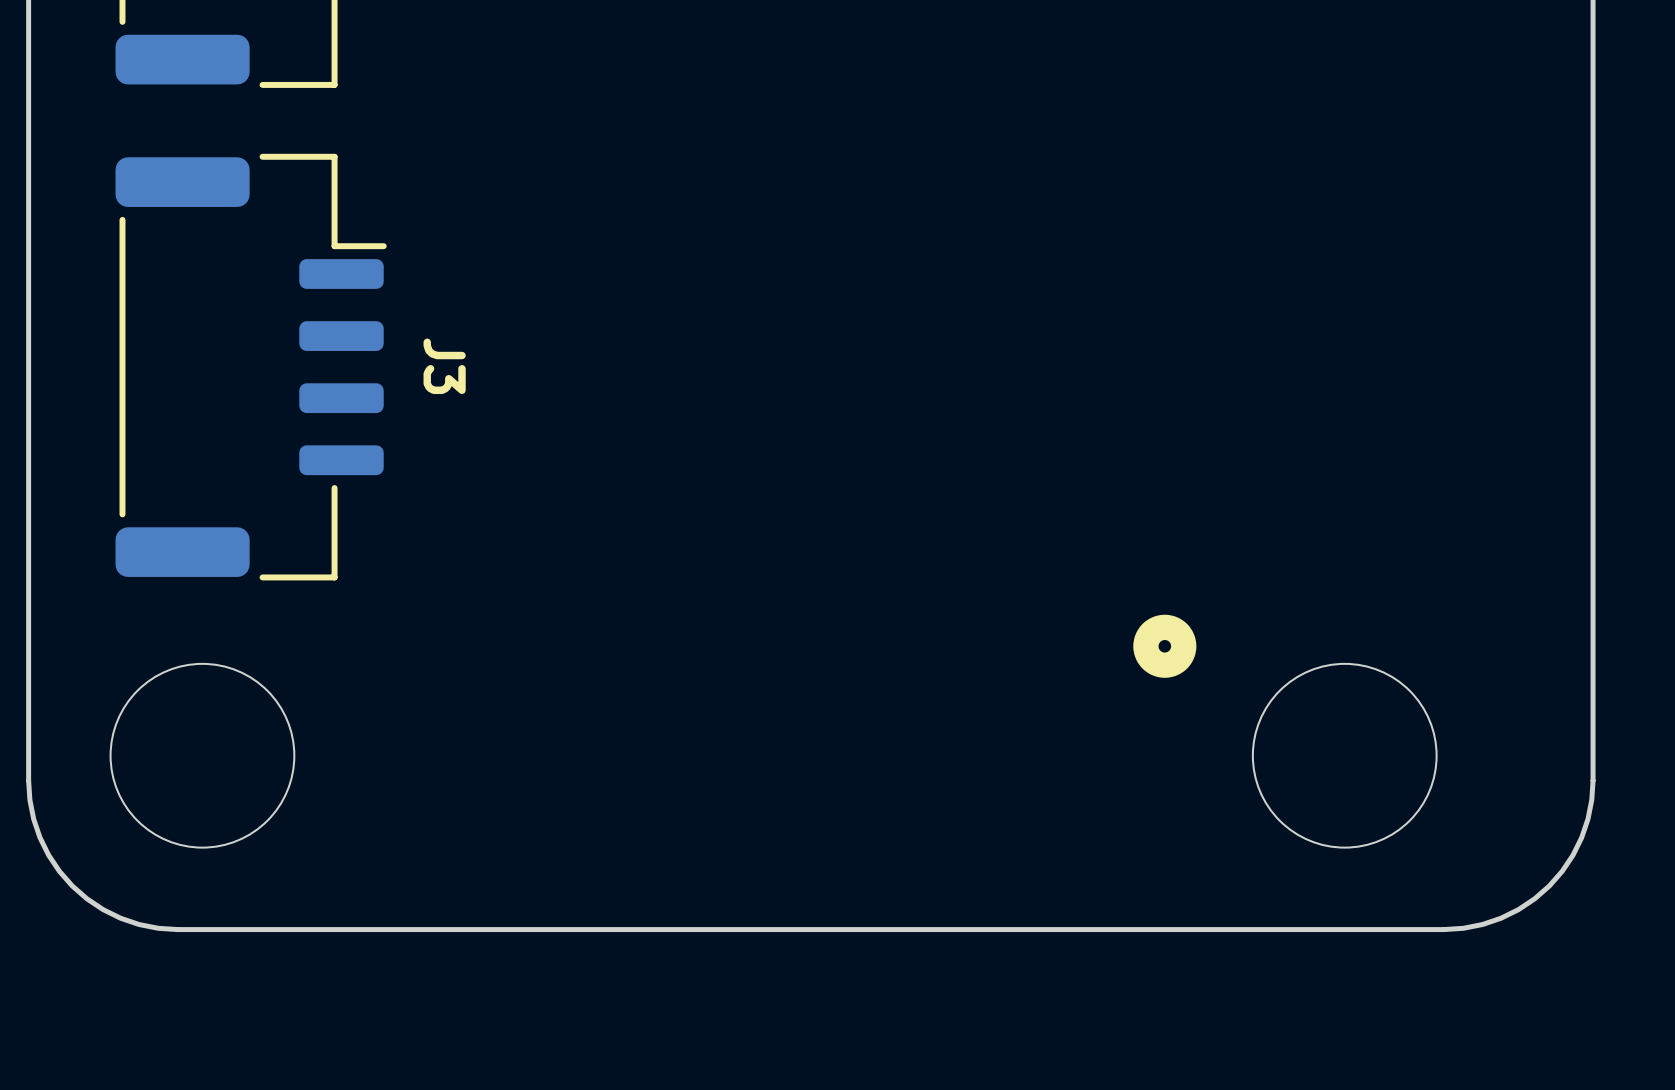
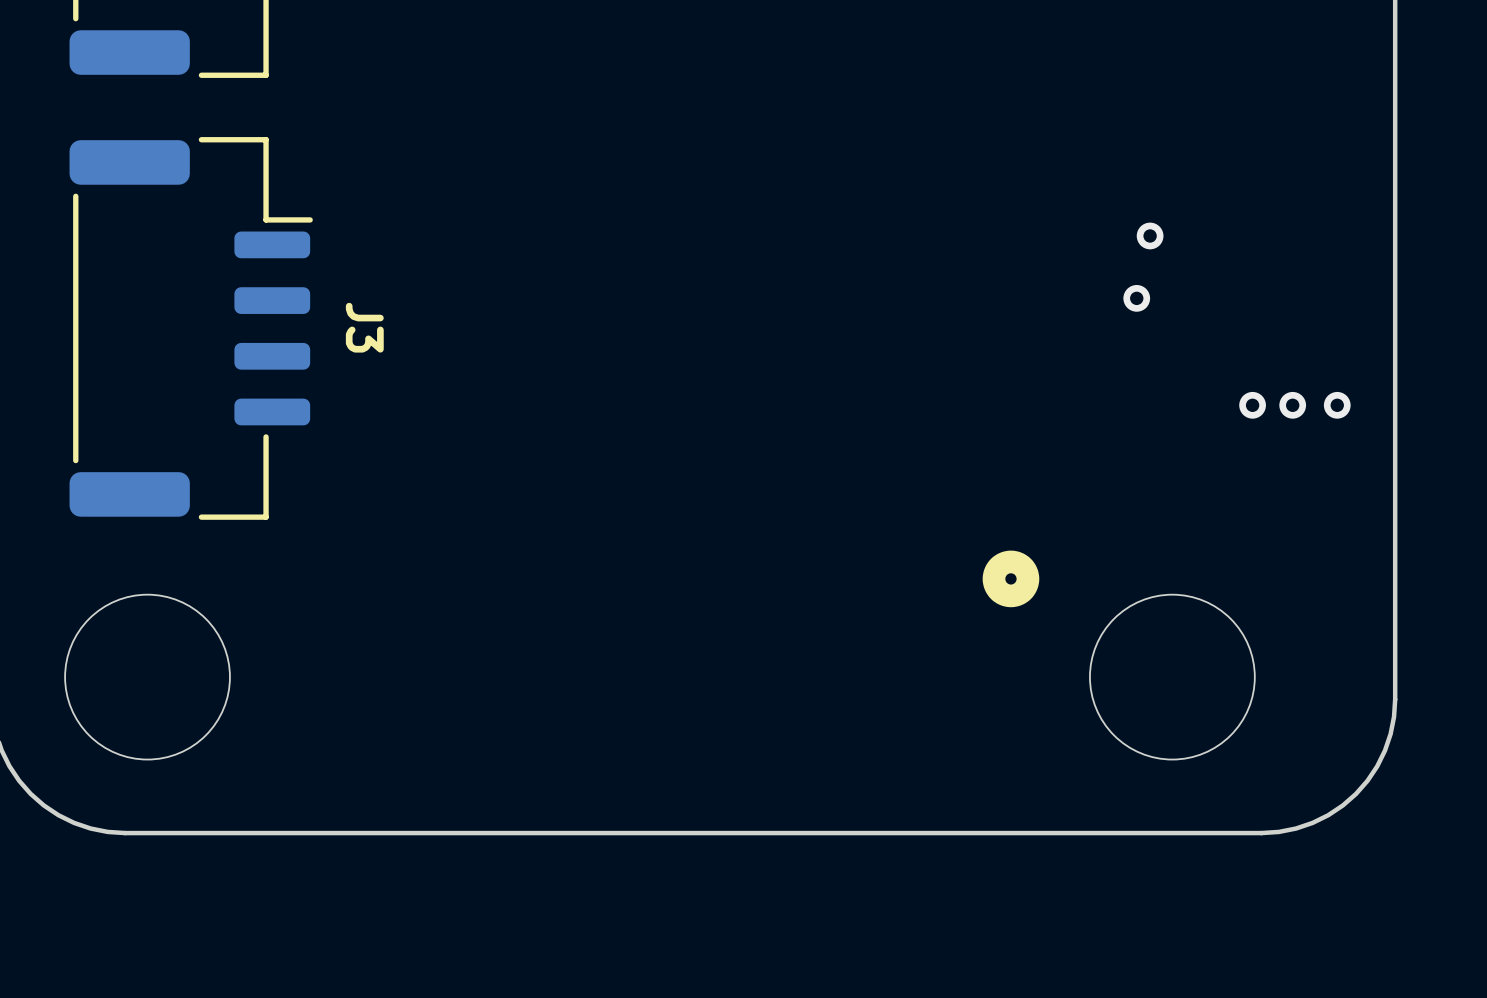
via: none -> (1150, 235)
via: none -> (1136, 298)
via: none -> (1252, 405)
via: none -> (1292, 405)
via: none -> (1337, 405)

